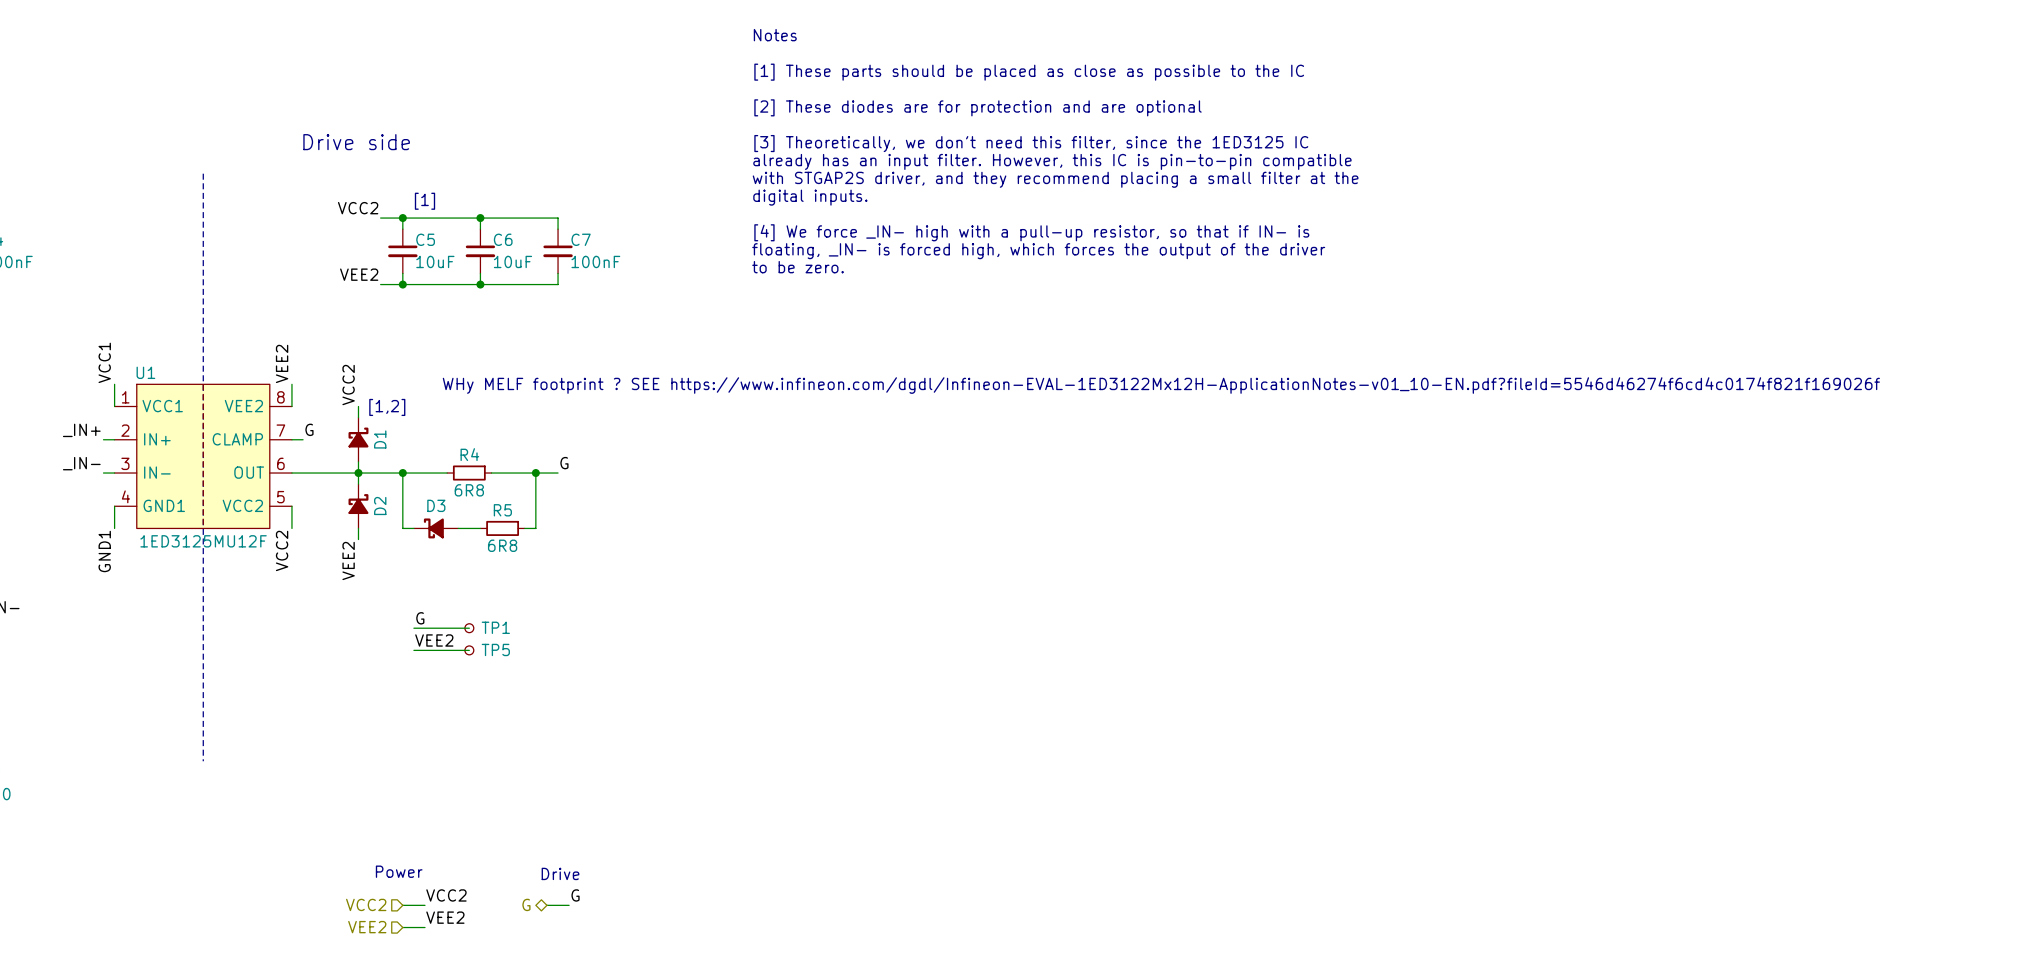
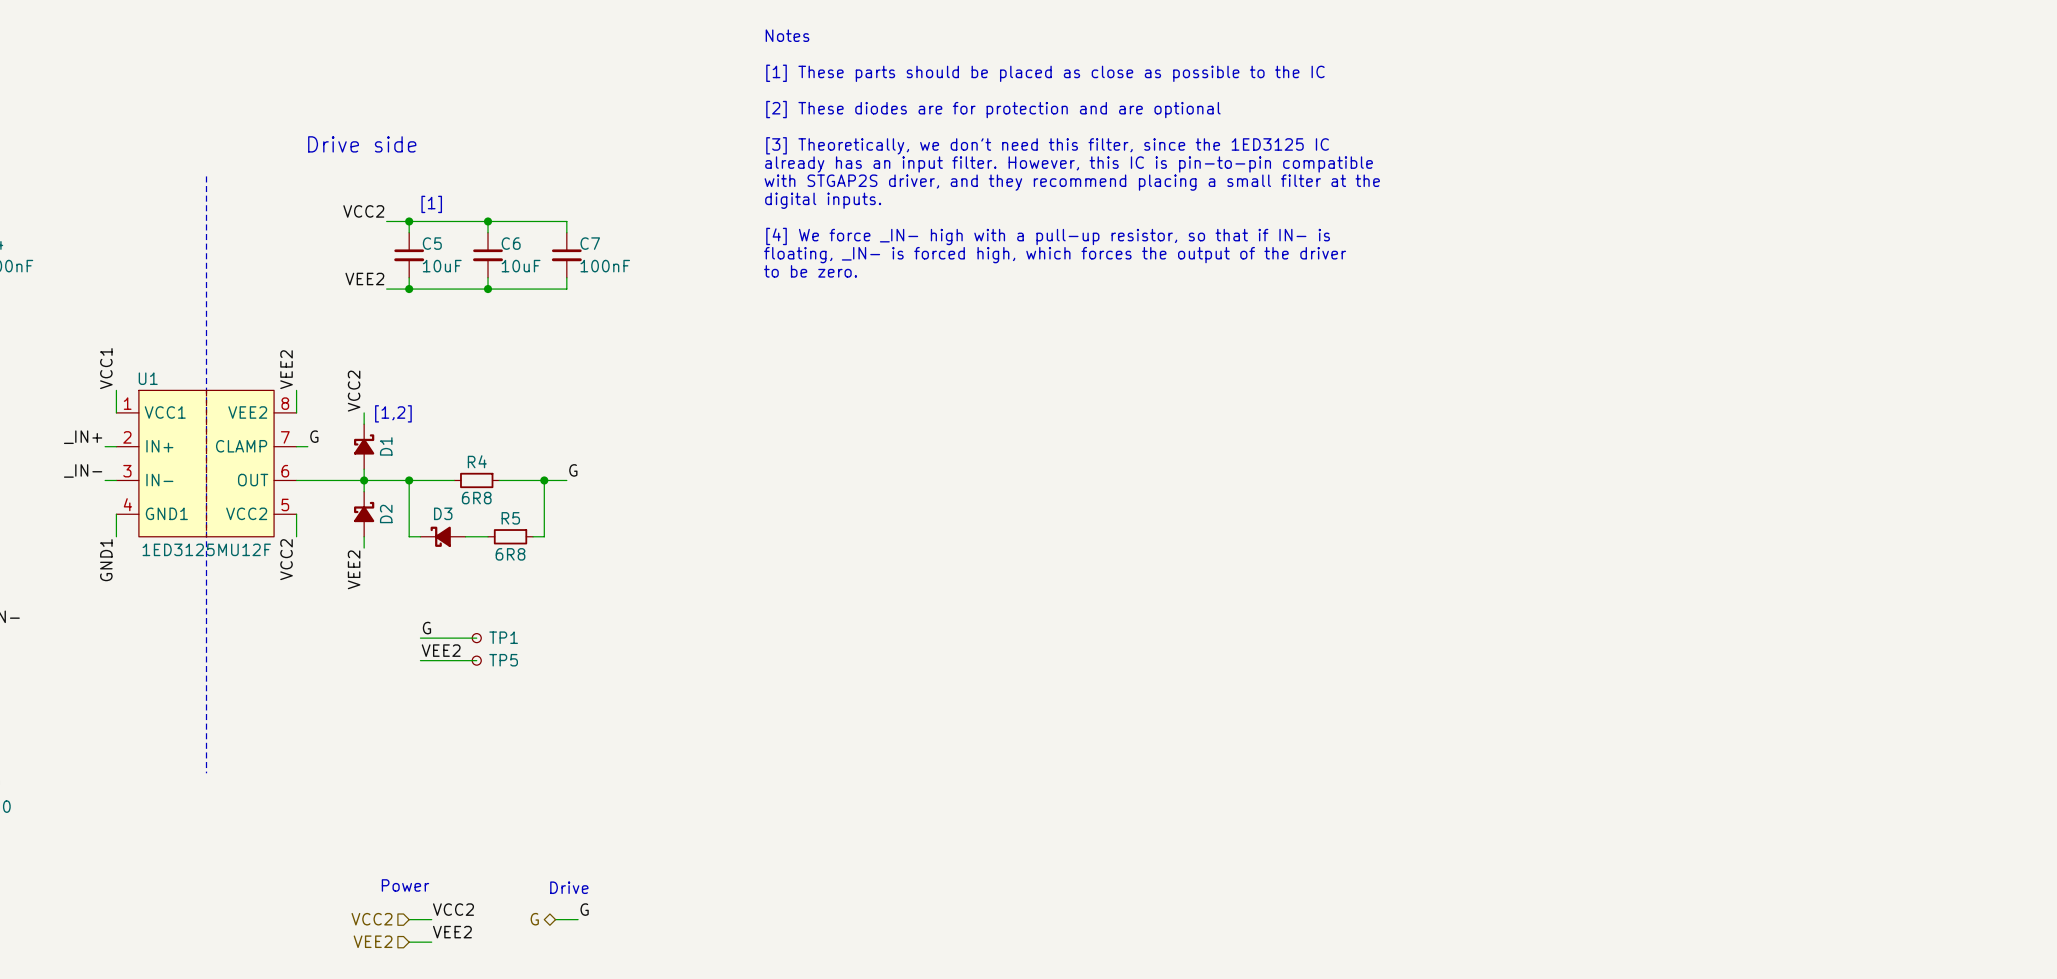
text: WHy MELF footprint ? SEE https://www.infineon.com/dgdl/Infineon-EVAL-1ED3122Mx12H-ApplicationNotes-v01_10-EN.pdf?fileId=5546d46274f6cd4c0174f821f169026f (1161, 385) -> none

